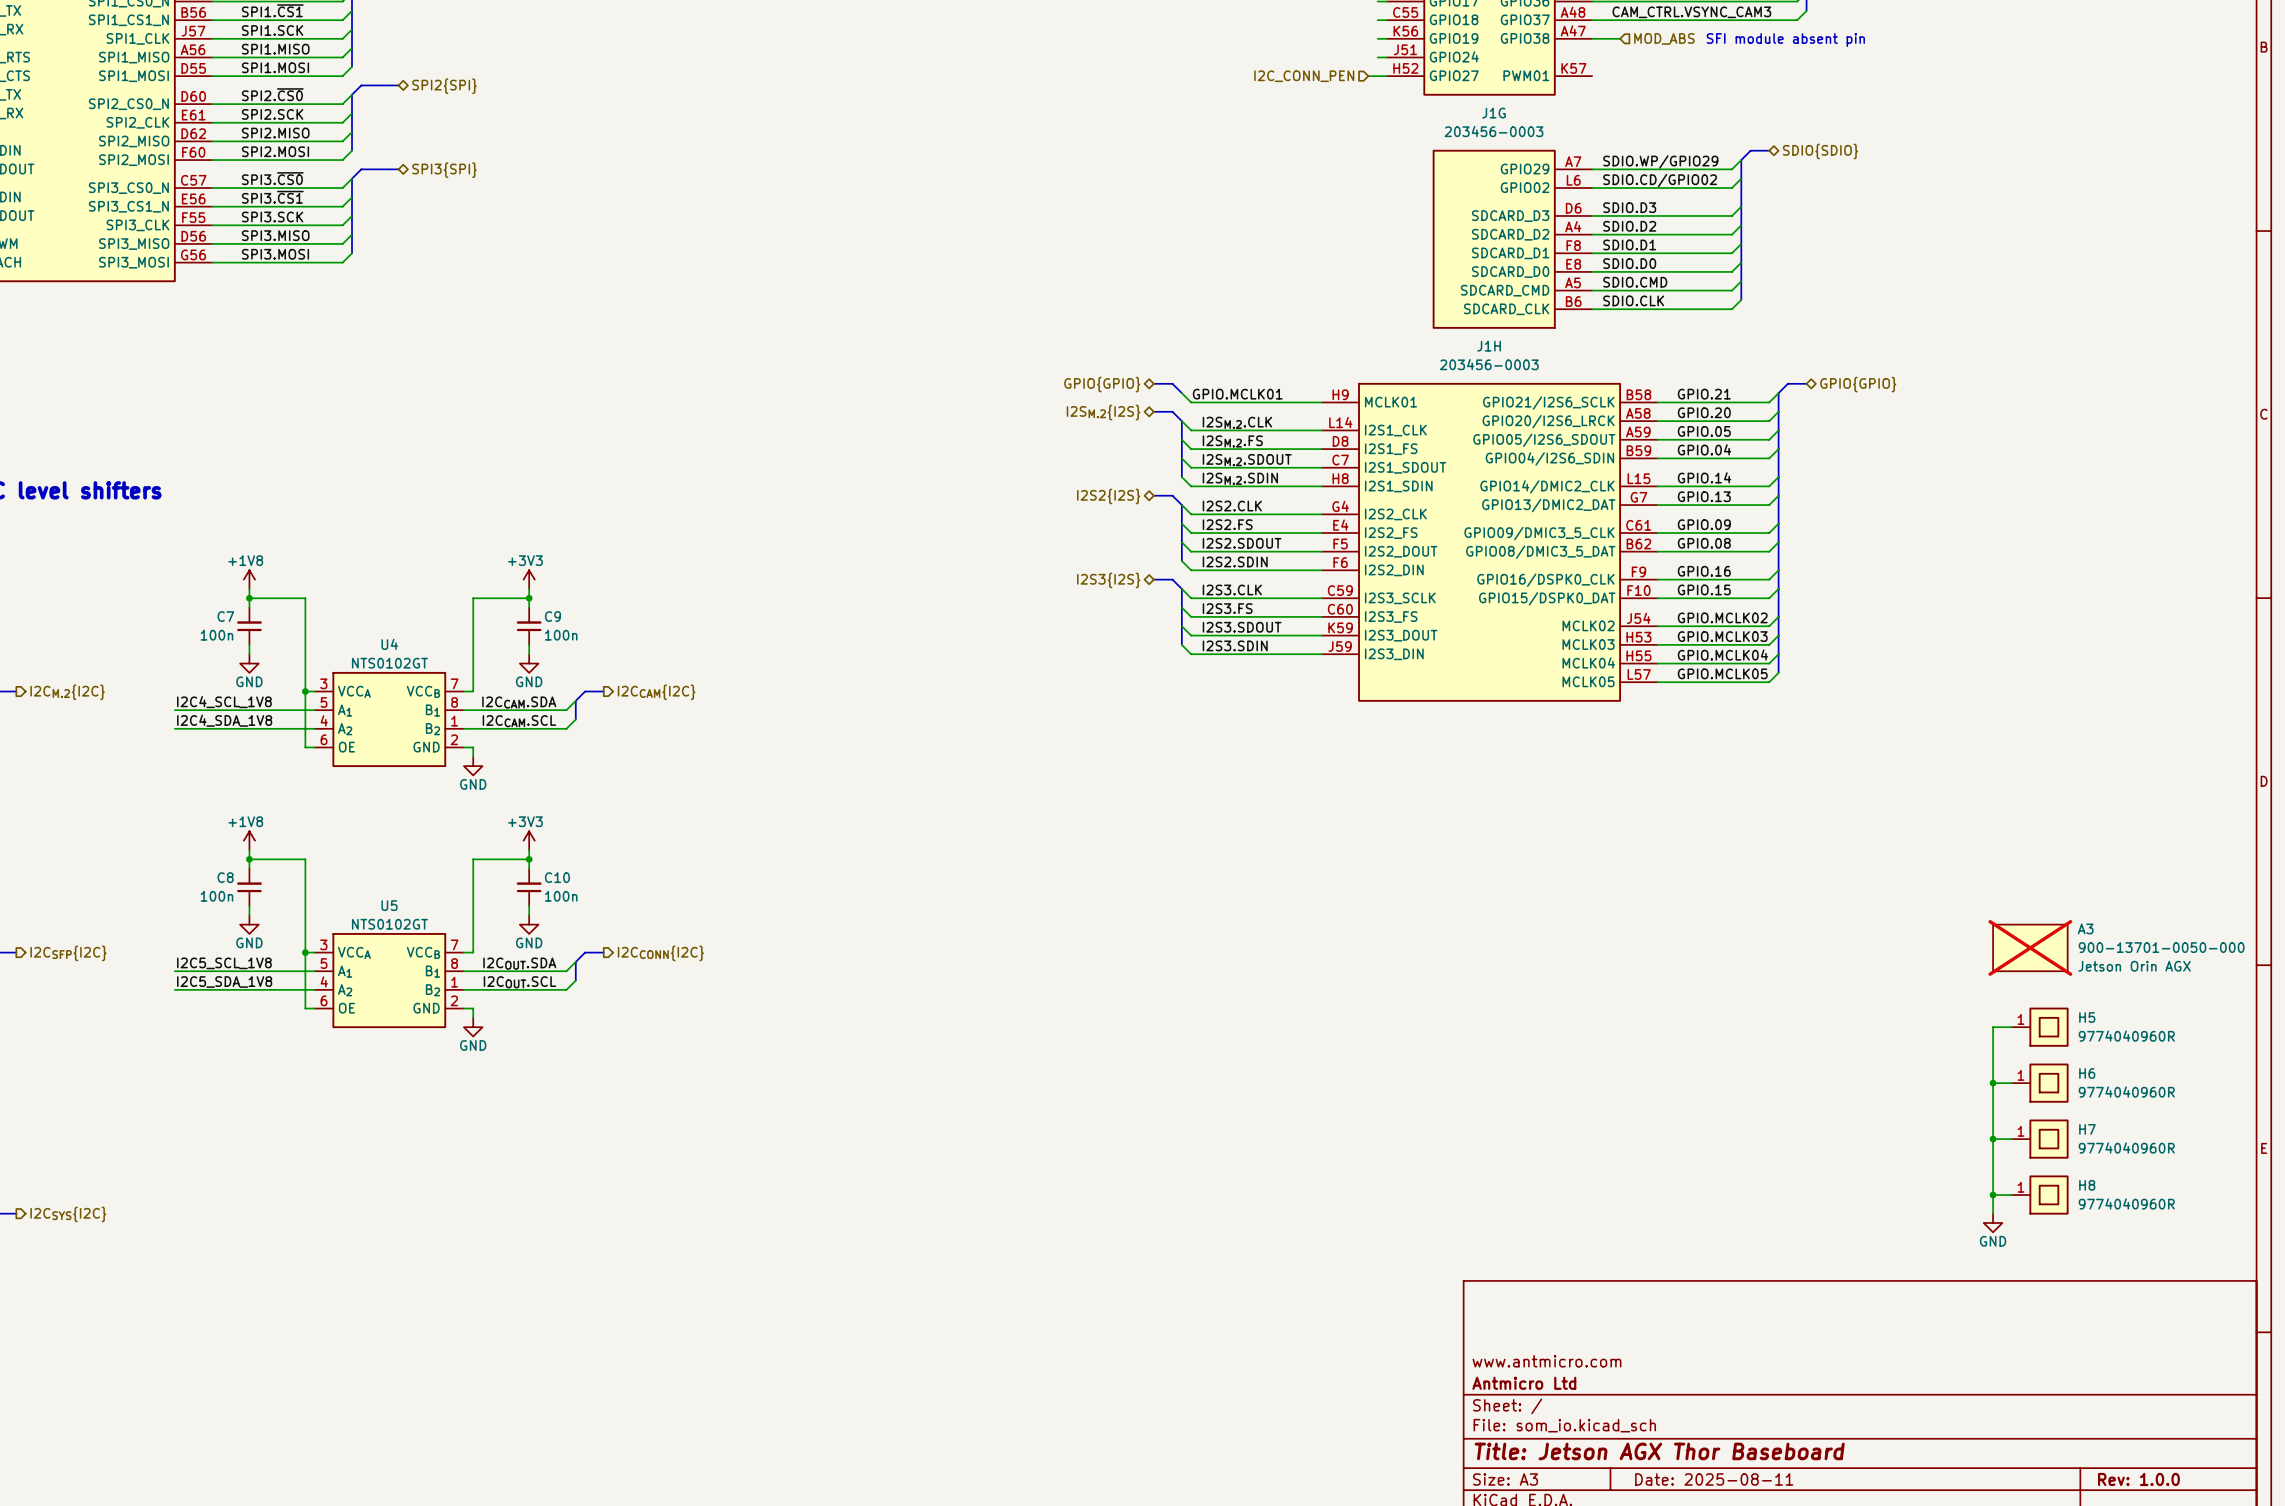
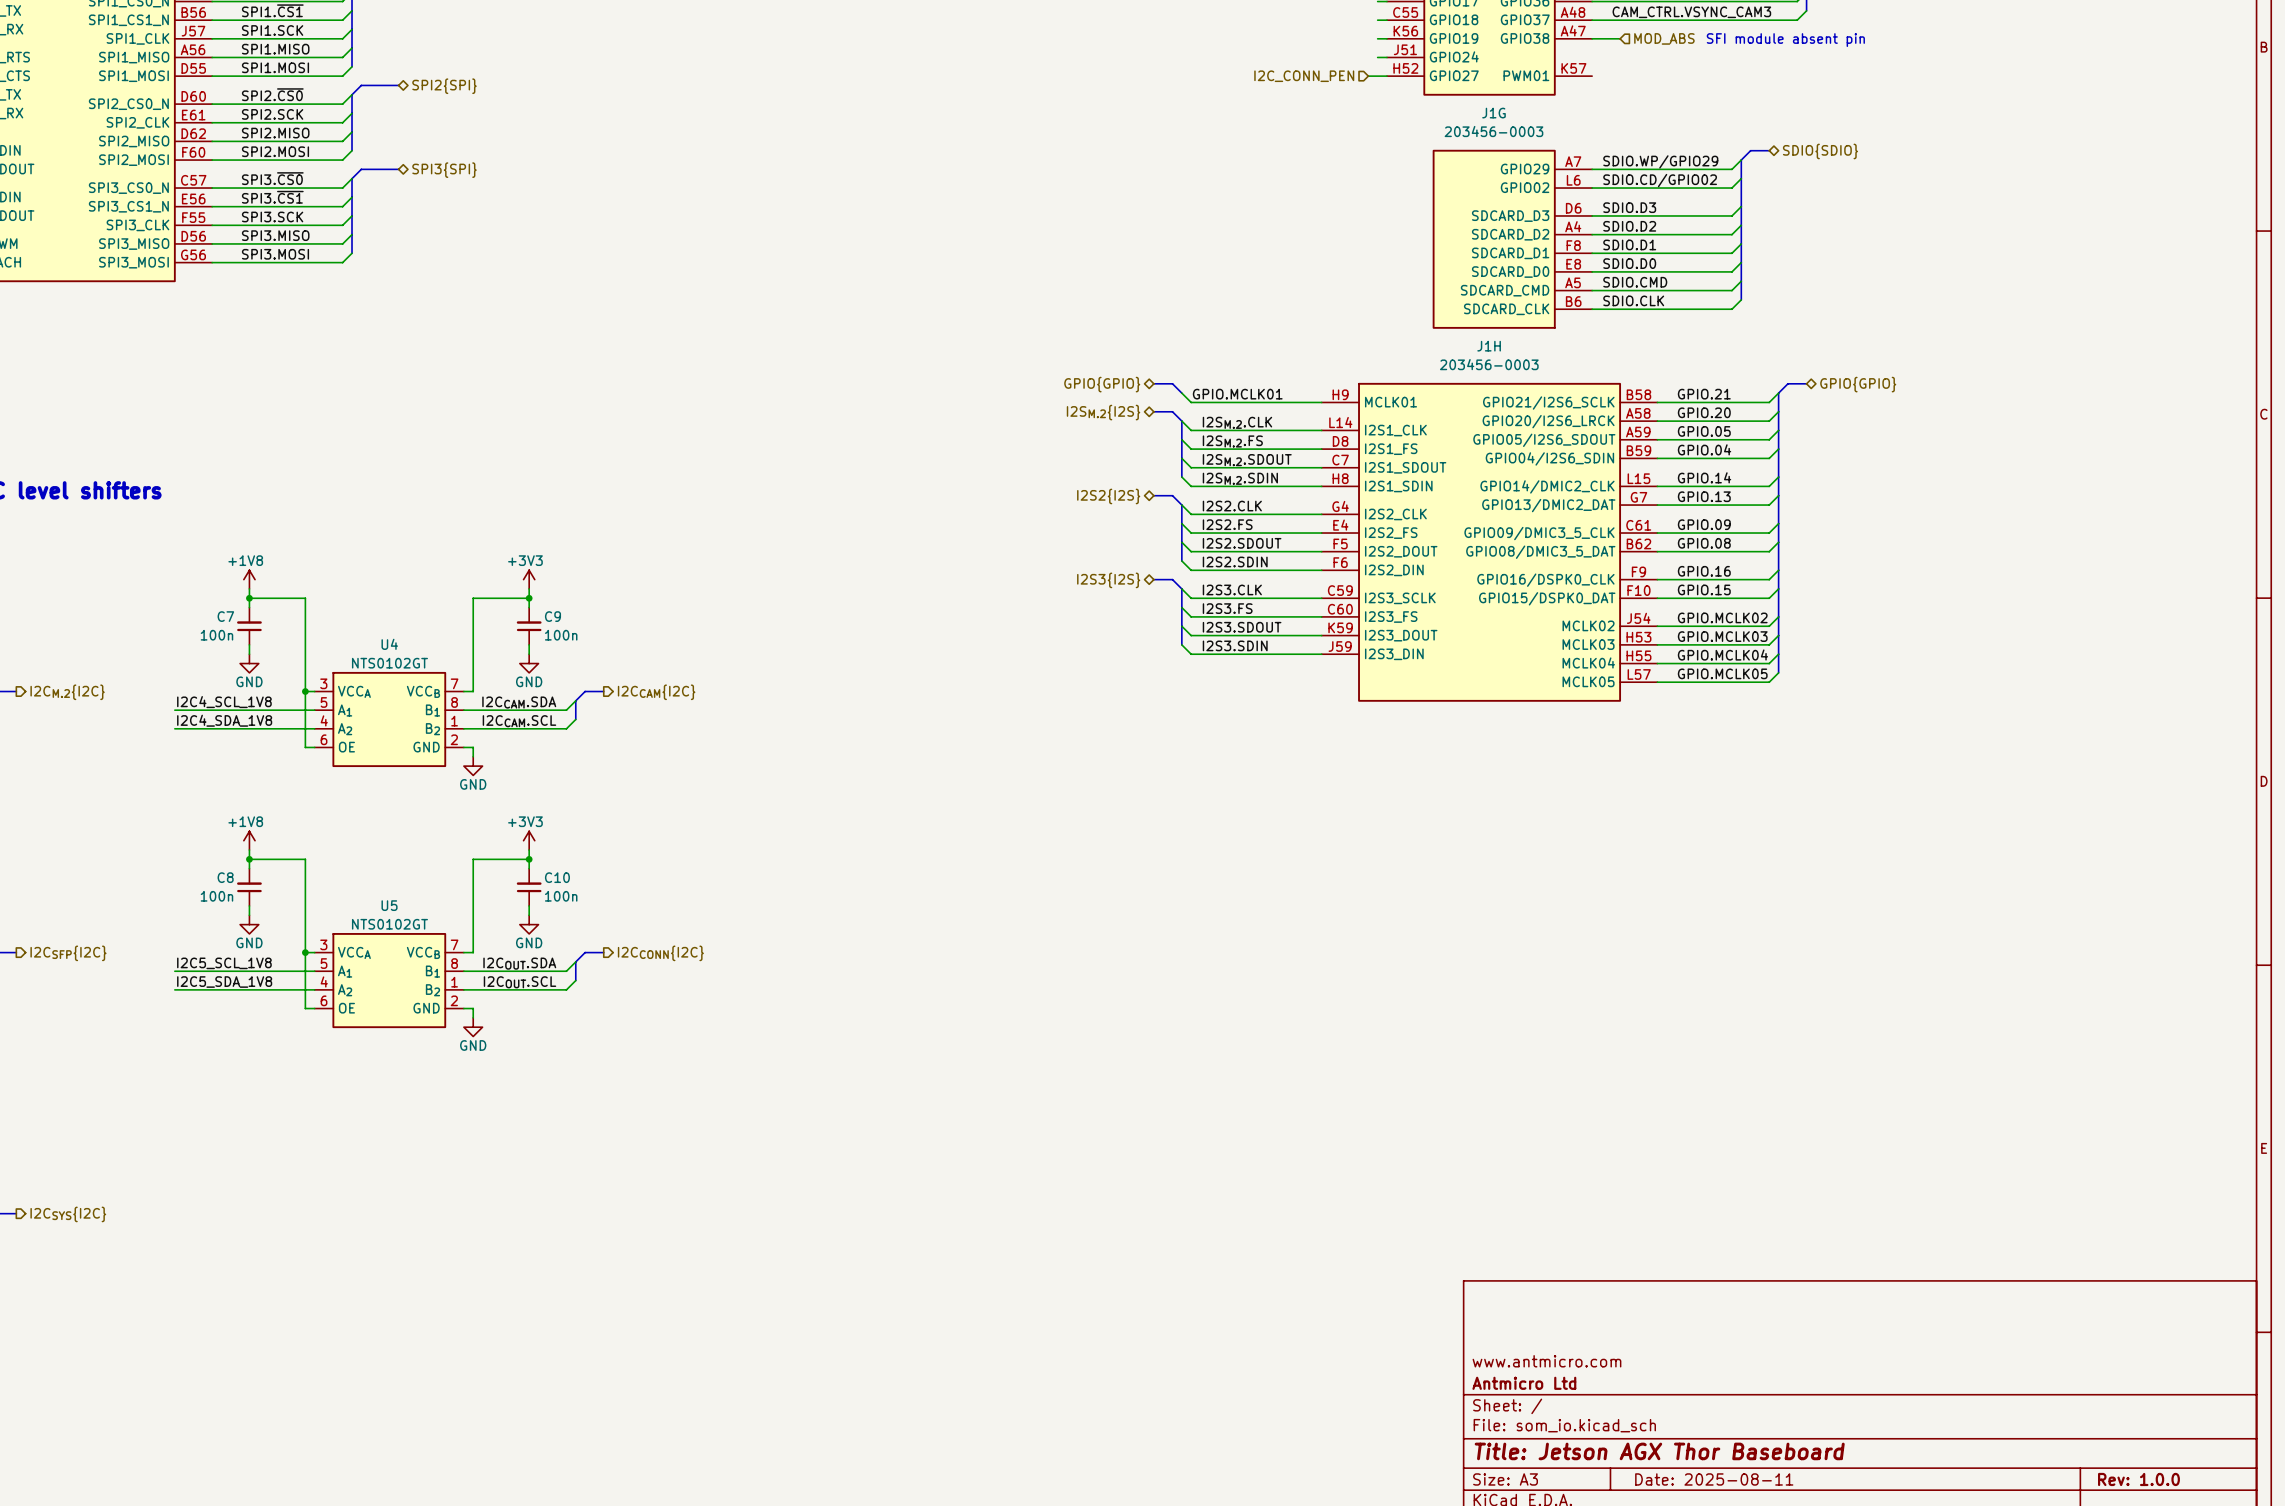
A3: (2030, 947) -> none
wire: (2011, 1027) (1993, 1027) (1993, 1213) -> none
H5: (2040, 1027) -> none
wire: (1993, 1083) (2011, 1083) -> none
junction: (1993, 1083) -> none
H6: (2040, 1083) -> none
wire: (1993, 1139) (2011, 1139) -> none
junction: (1993, 1139) -> none
H7: (2040, 1139) -> none
wire: (1993, 1195) (2011, 1195) -> none
junction: (1993, 1195) -> none
H8: (2040, 1195) -> none
power symbol: GND (1993, 1222) -> none

